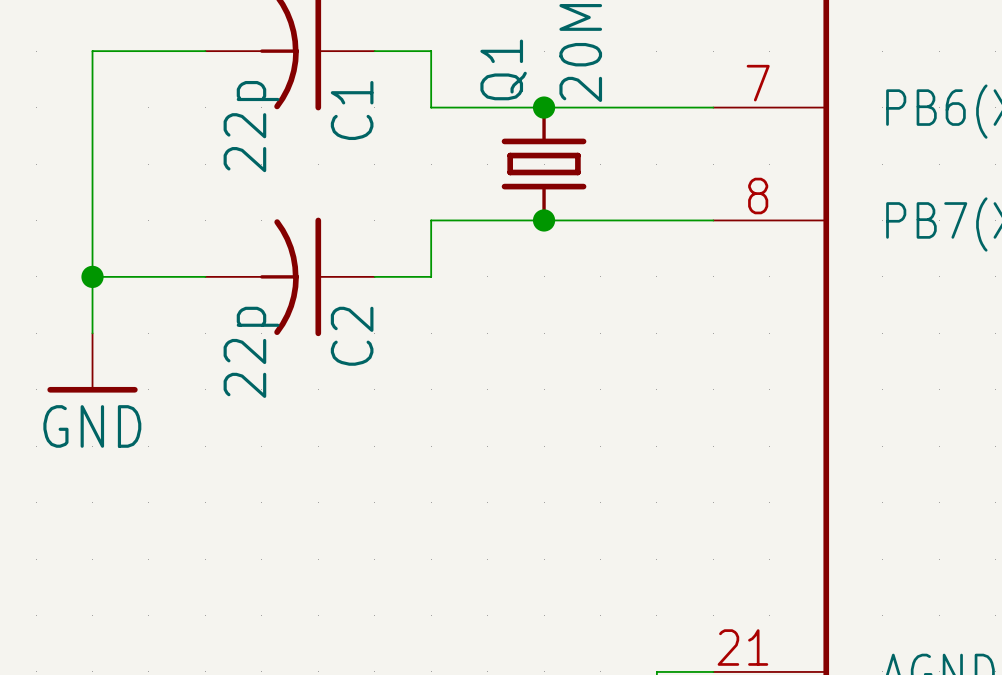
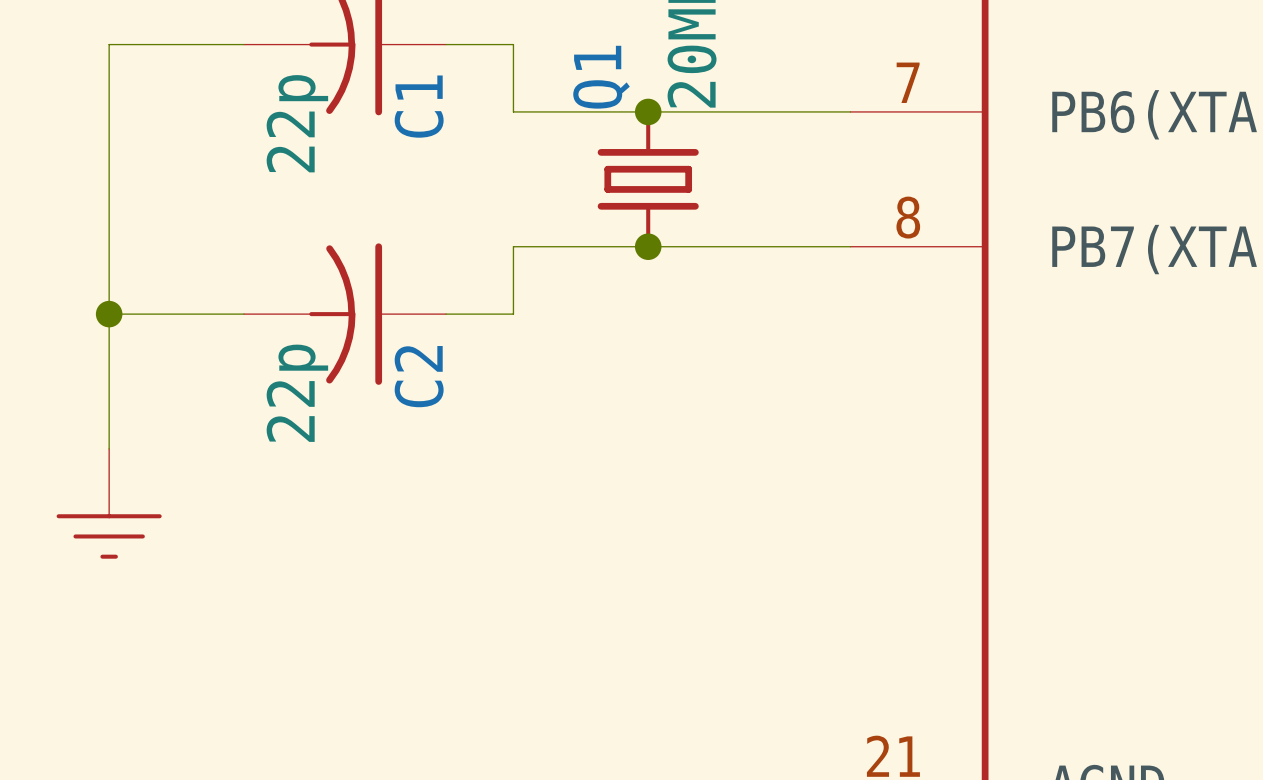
power symbol: GND (92, 362) -> none
power symbol: none -> (109, 503)

